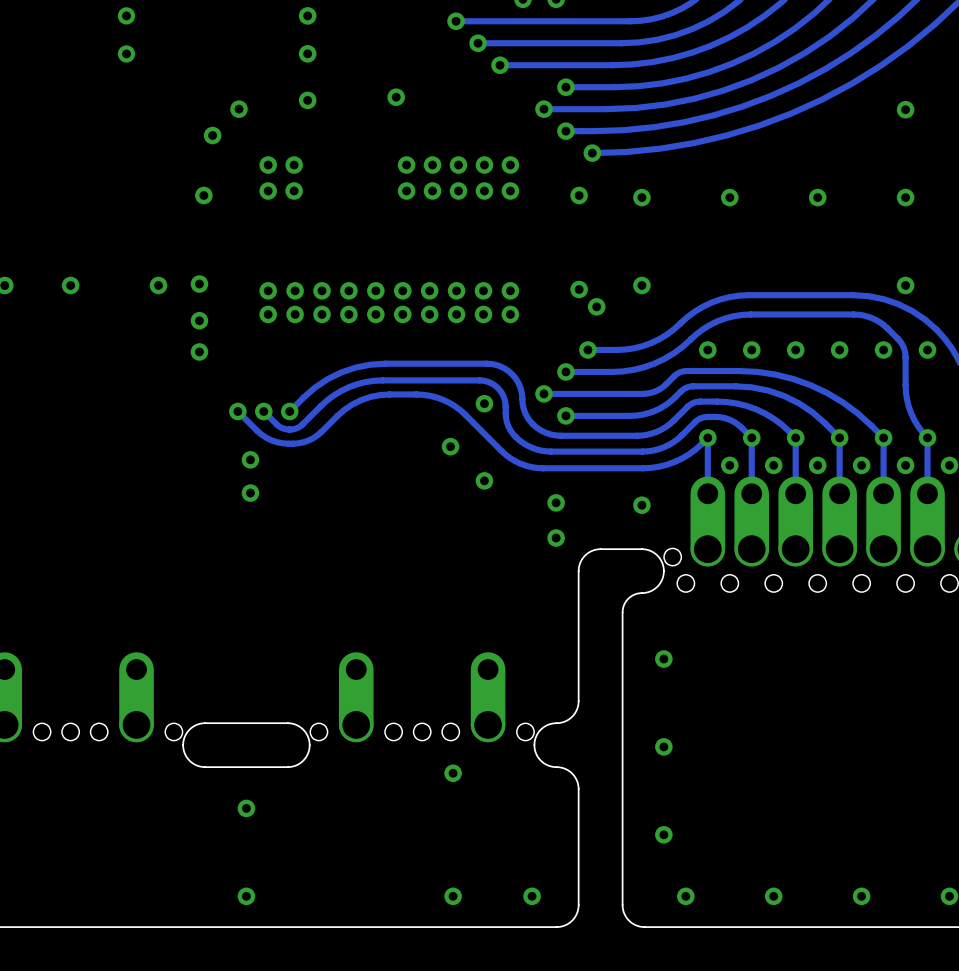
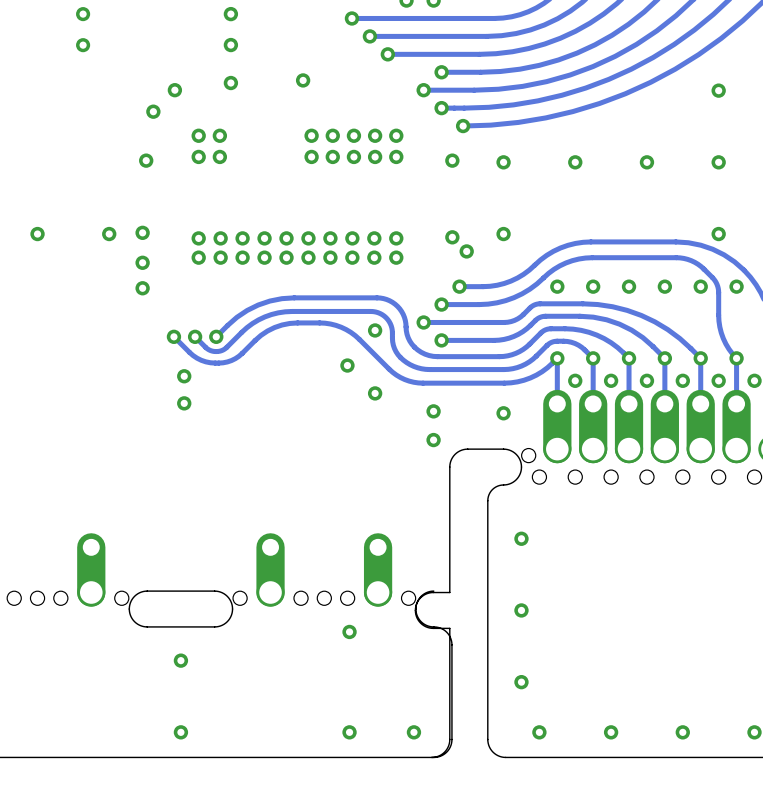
board edge: (600, 549) (586, 553) (582, 559) (578, 568) (578, 706) (570, 718) (556, 723) -> (469, 449) (456, 453) (449, 465) (449, 592) (425, 594) (418, 600) (415, 608) (417, 618) (423, 625) (431, 628) (449, 628) (449, 741) (444, 752) (431, 757)

